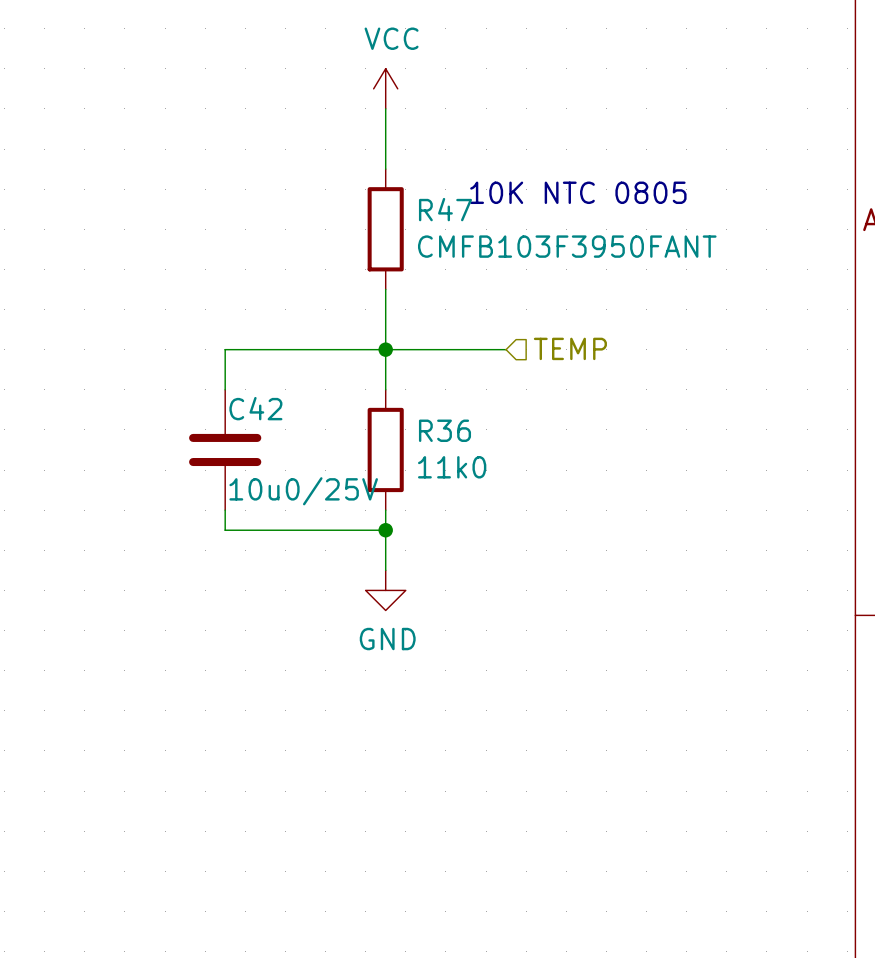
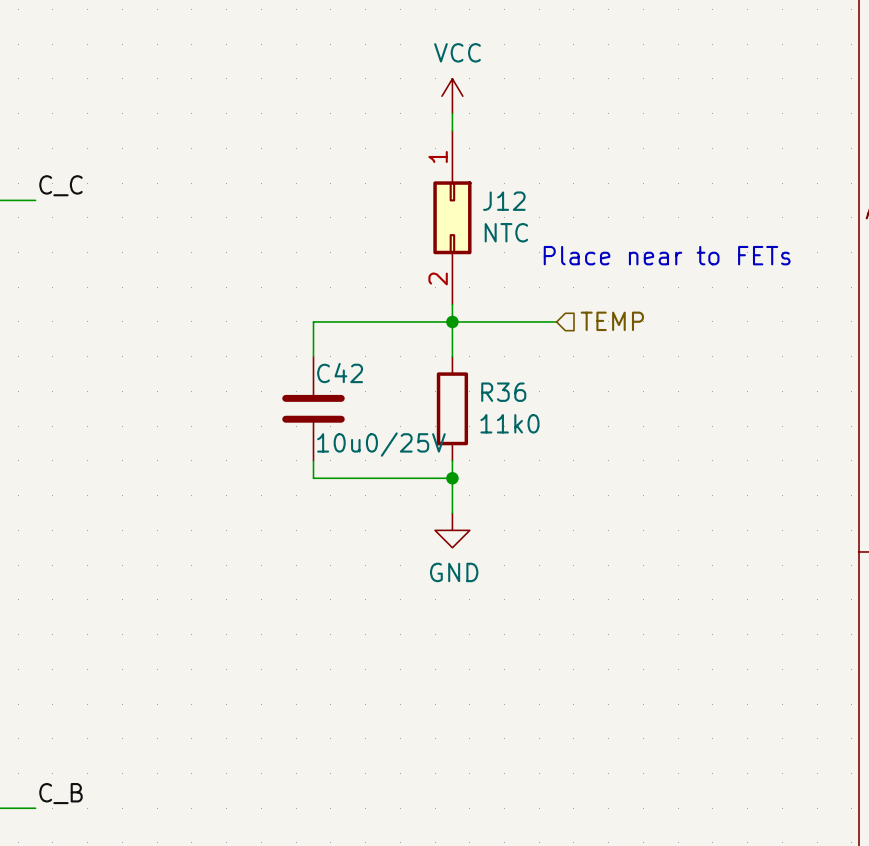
text: 10K NTC 0805 (578, 192) -> none
R47: CMFB103F3950FANT (385, 229) -> none
J12: none -> NTC (452, 217)
text: none -> Place near to FETs (667, 255)

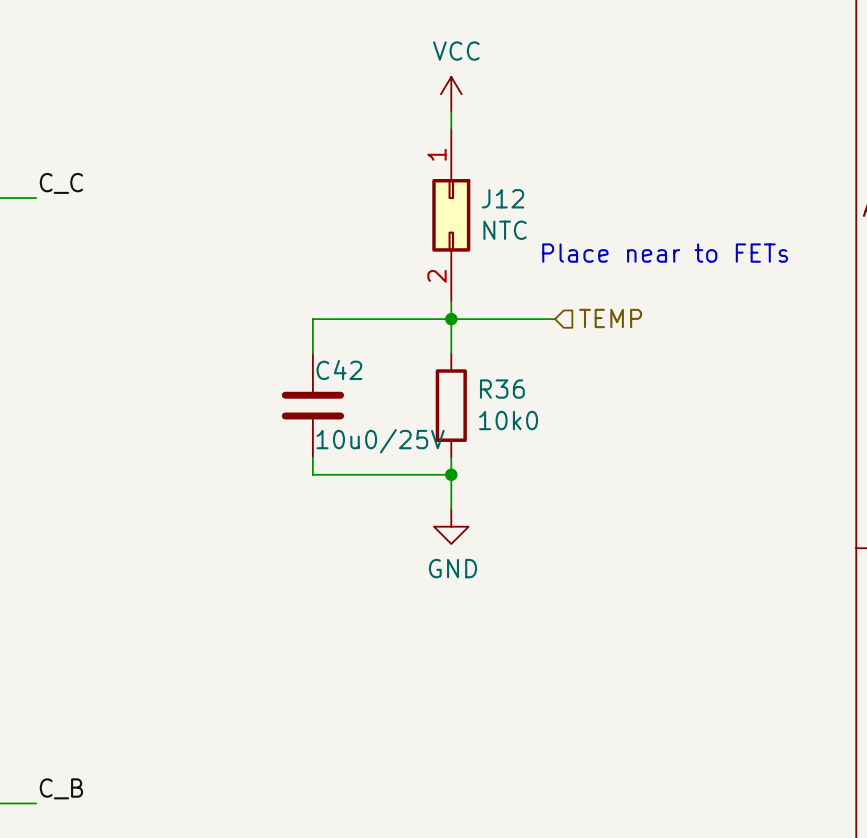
R36 value: 11k0 (509, 423) -> 10k0 (508, 420)

